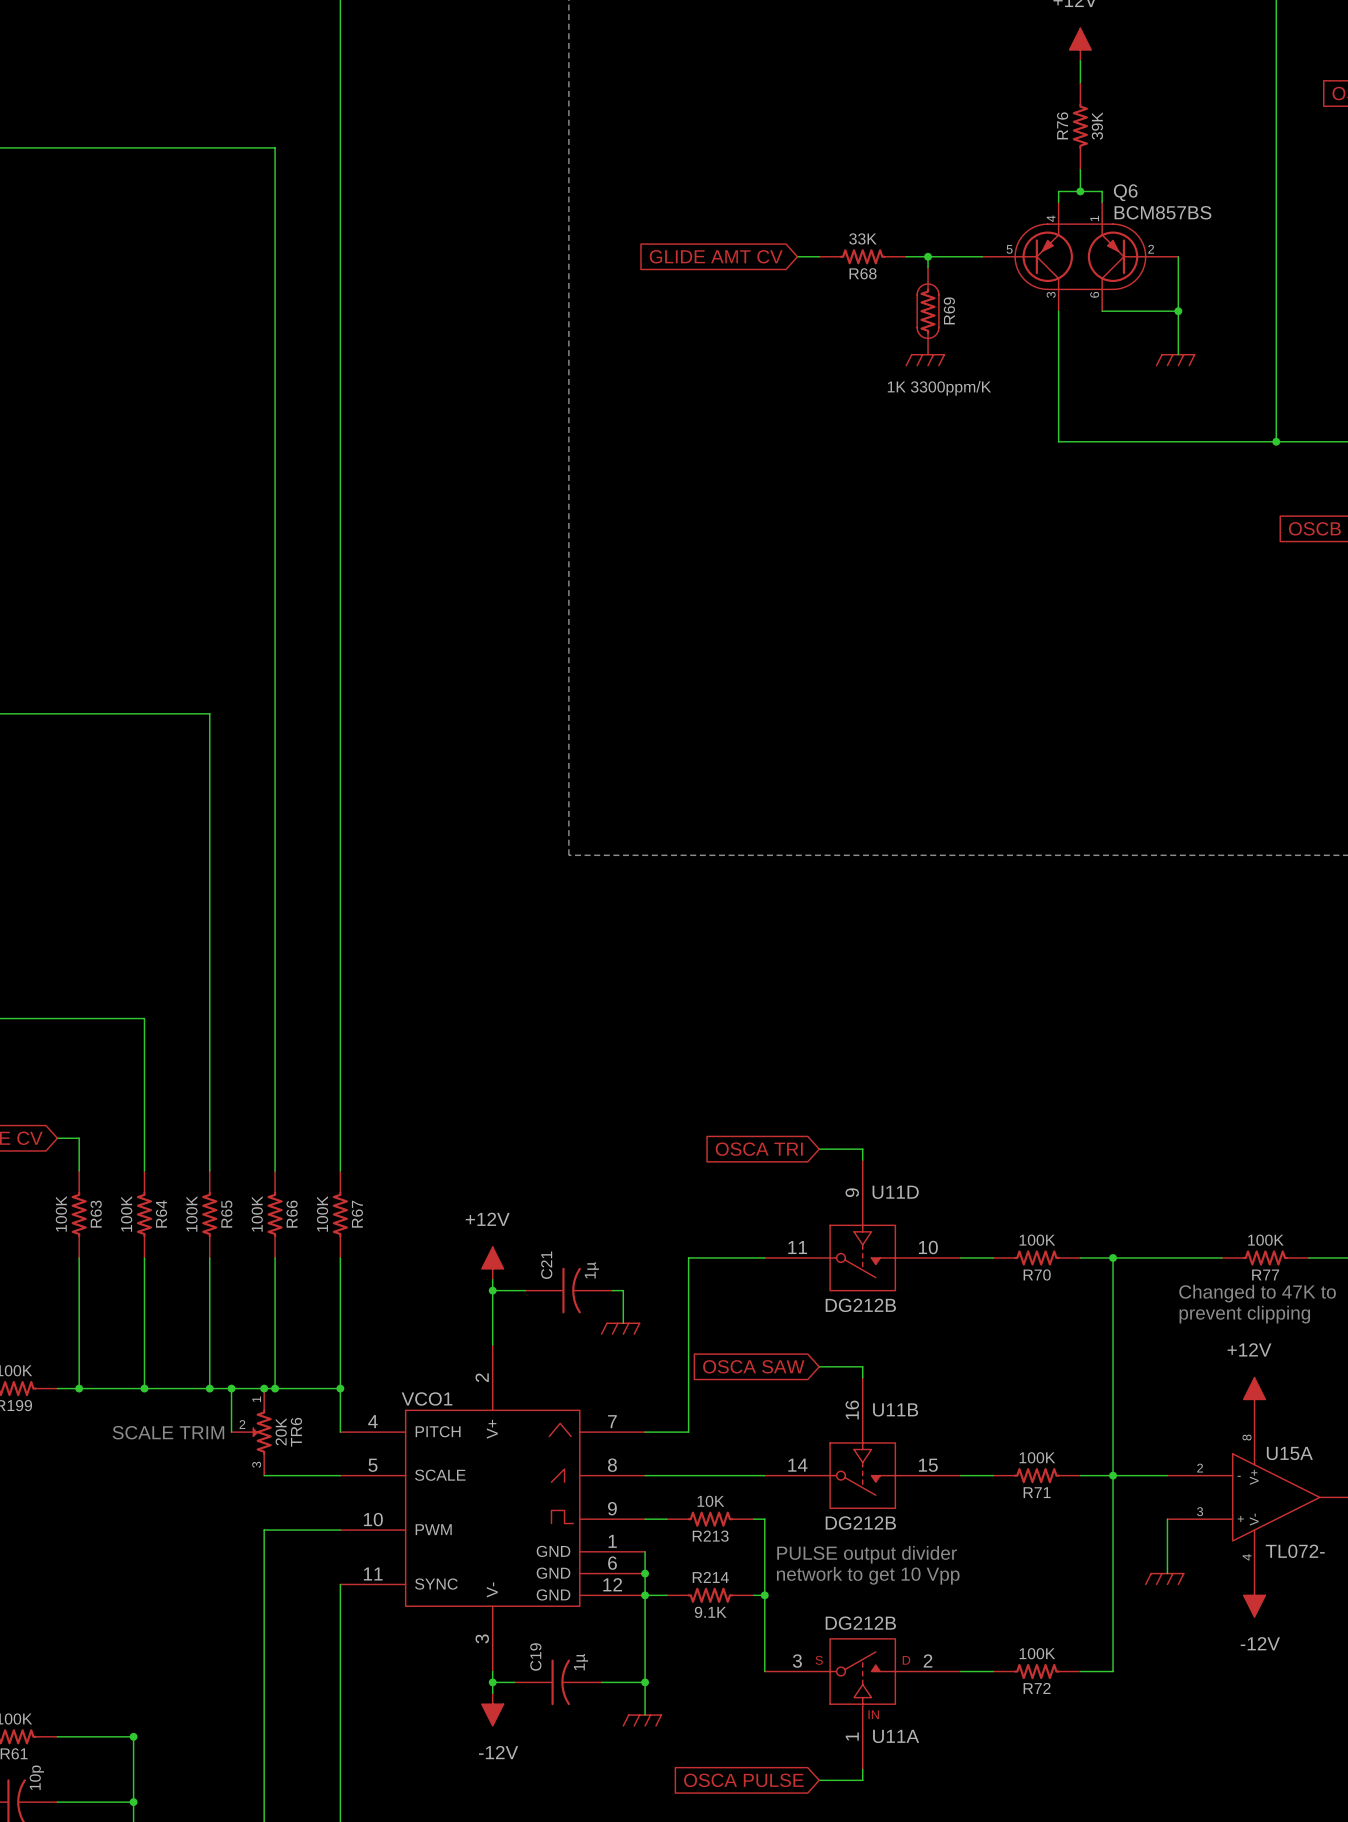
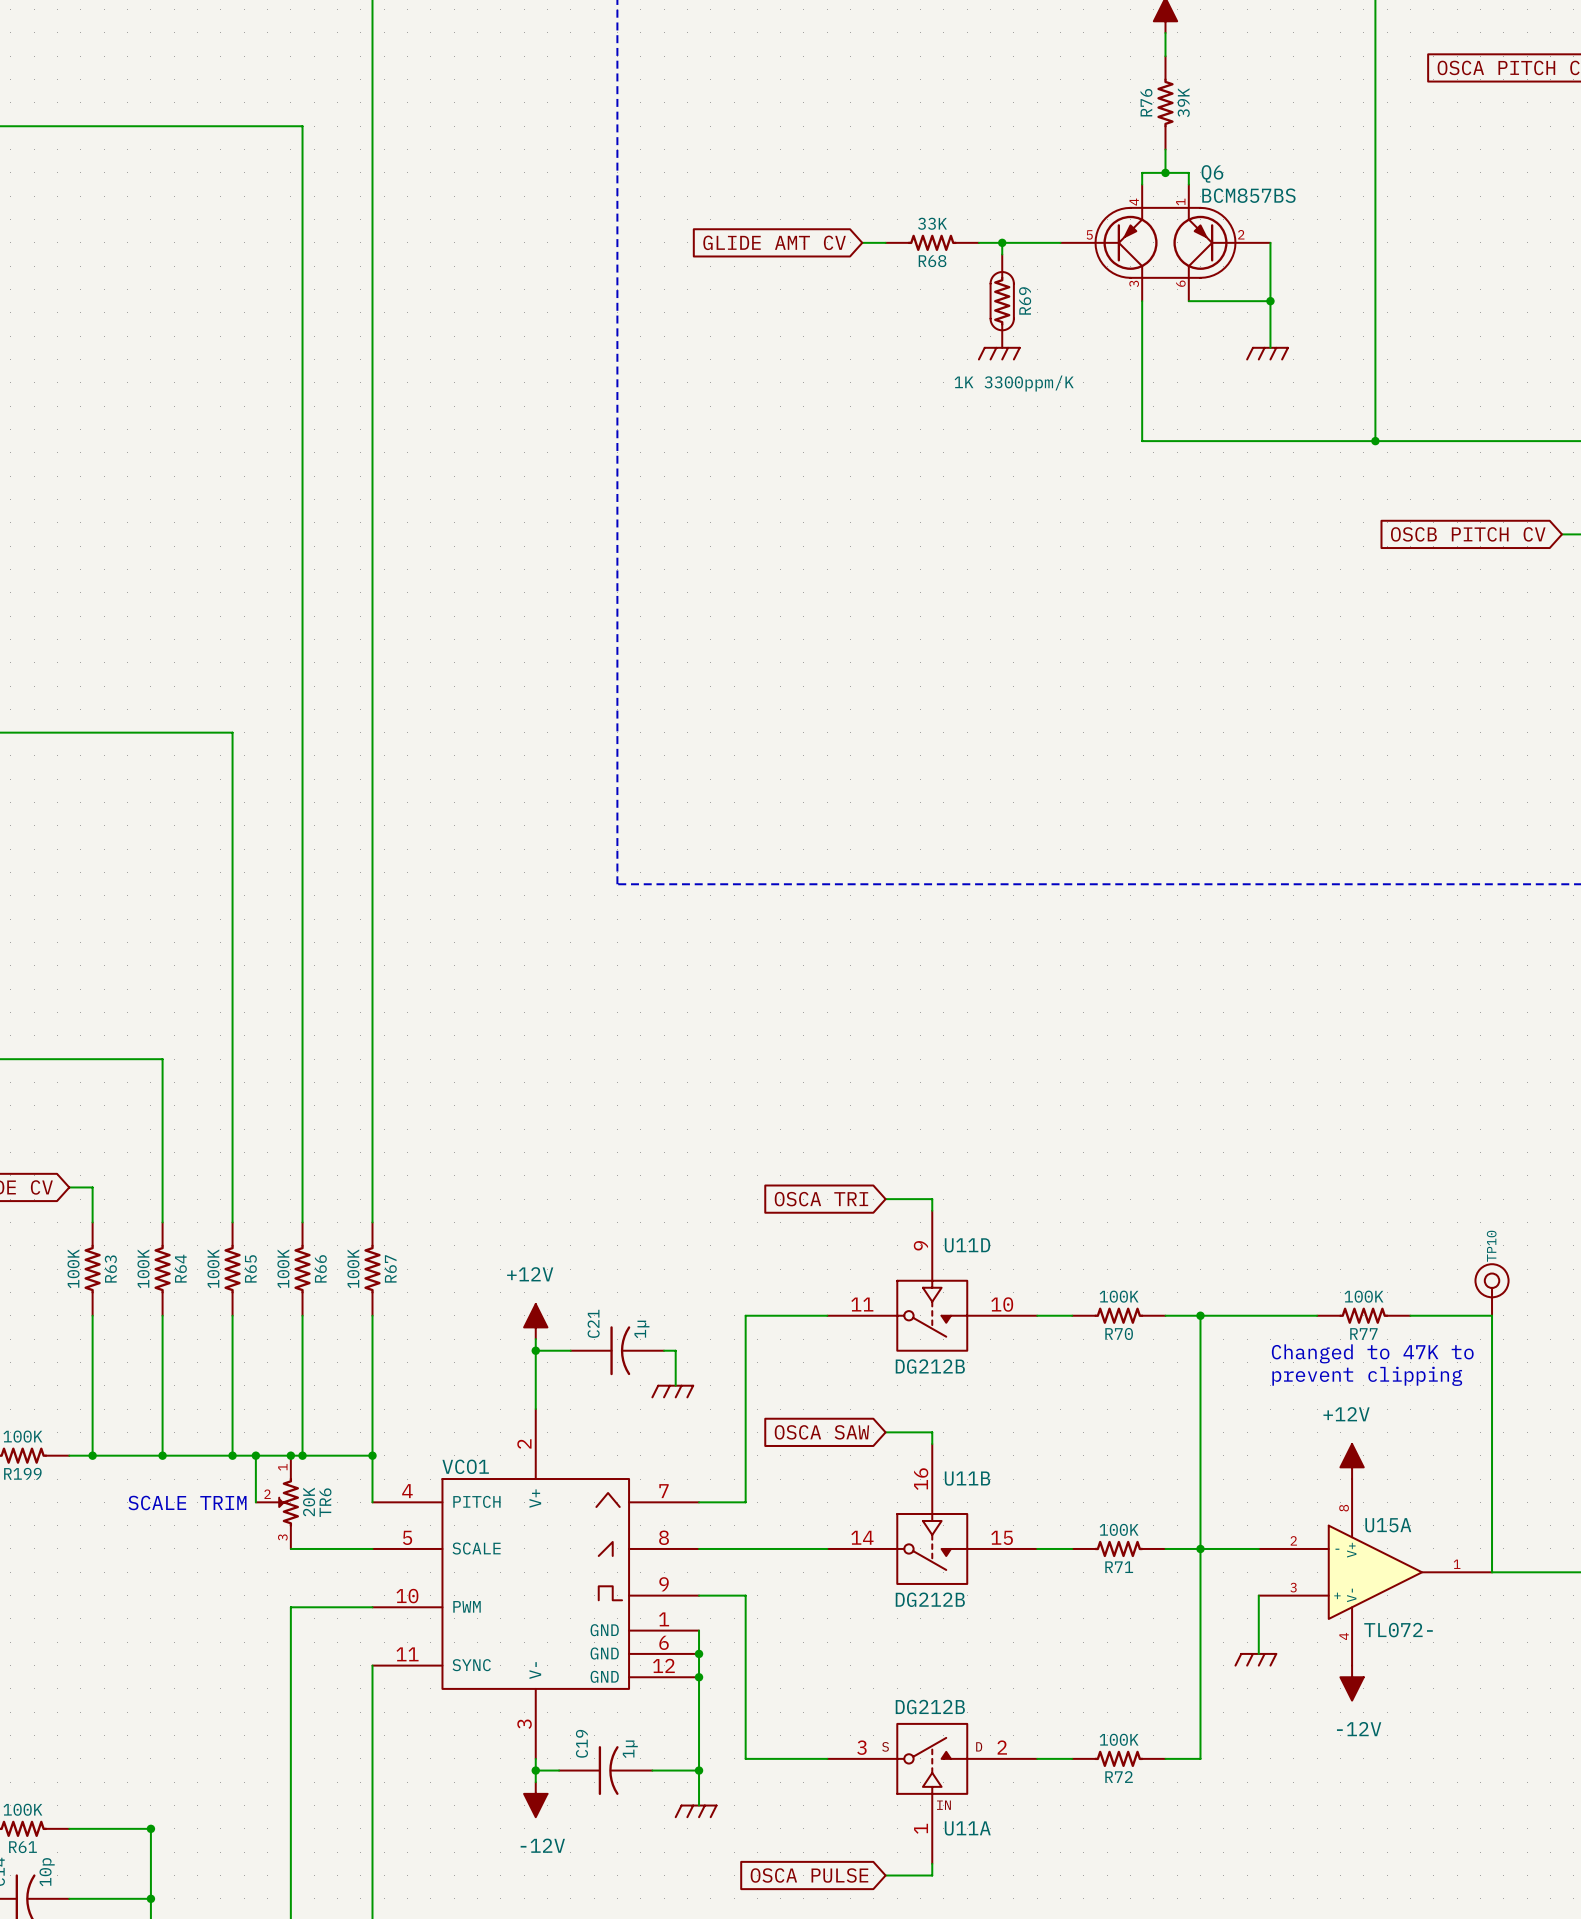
R213: 10K (710, 1519) -> none
wire: (753, 1519) (764, 1519) (764, 1671) -> (722, 1595) (745, 1595) (745, 1758) (827, 1758)
text: PULSE output divider (867, 1554) -> none
text: network to get 10 Vpp (868, 1575) -> none
wire: (645, 1595) (666, 1595) -> none
R214: 9.1K (710, 1595) -> none
wire: (753, 1595) (764, 1595) -> none
junction: (764, 1595) -> none

